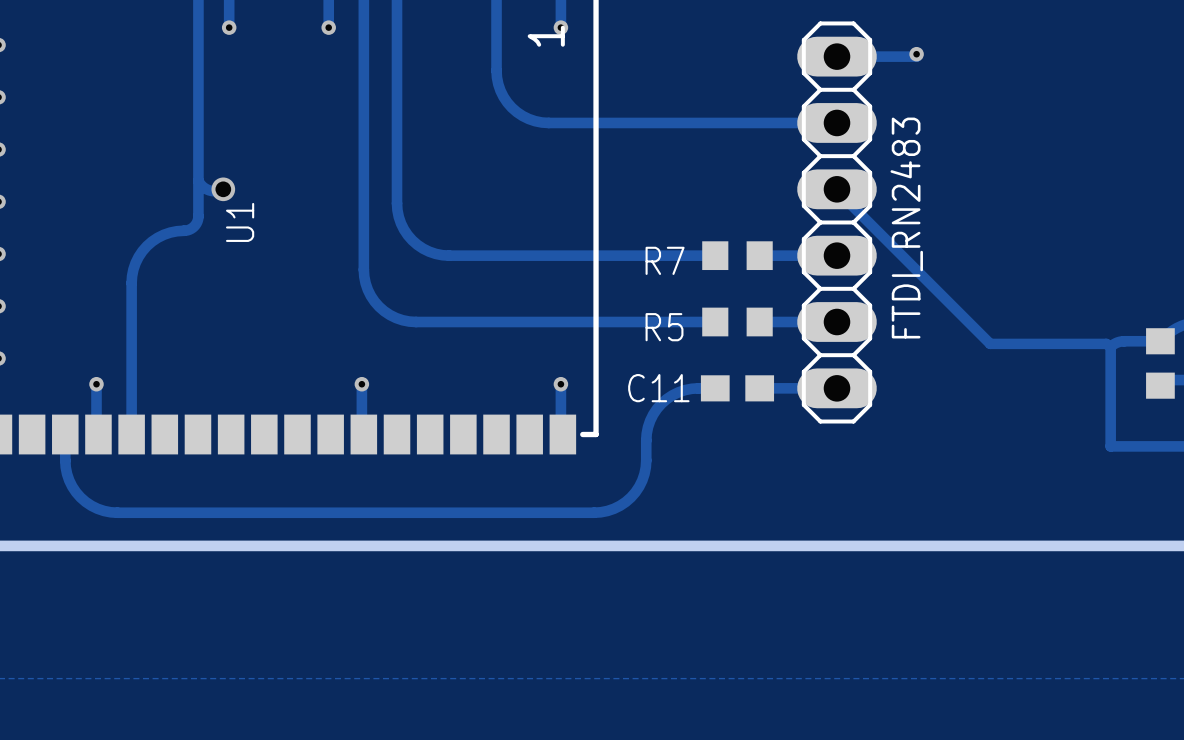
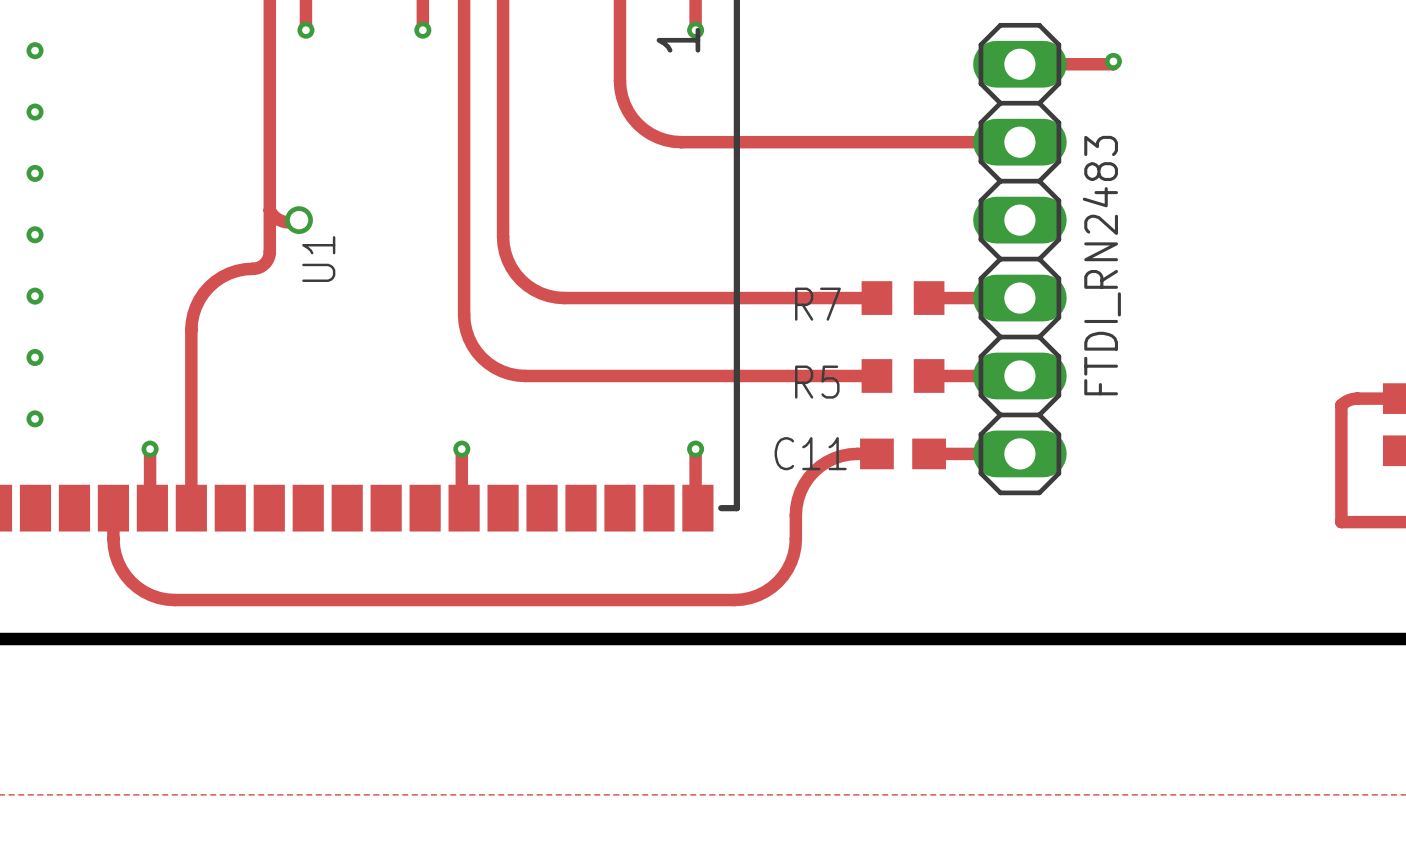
track: (836, 189) (990, 343) (1106, 343) (1110, 346) -> none

